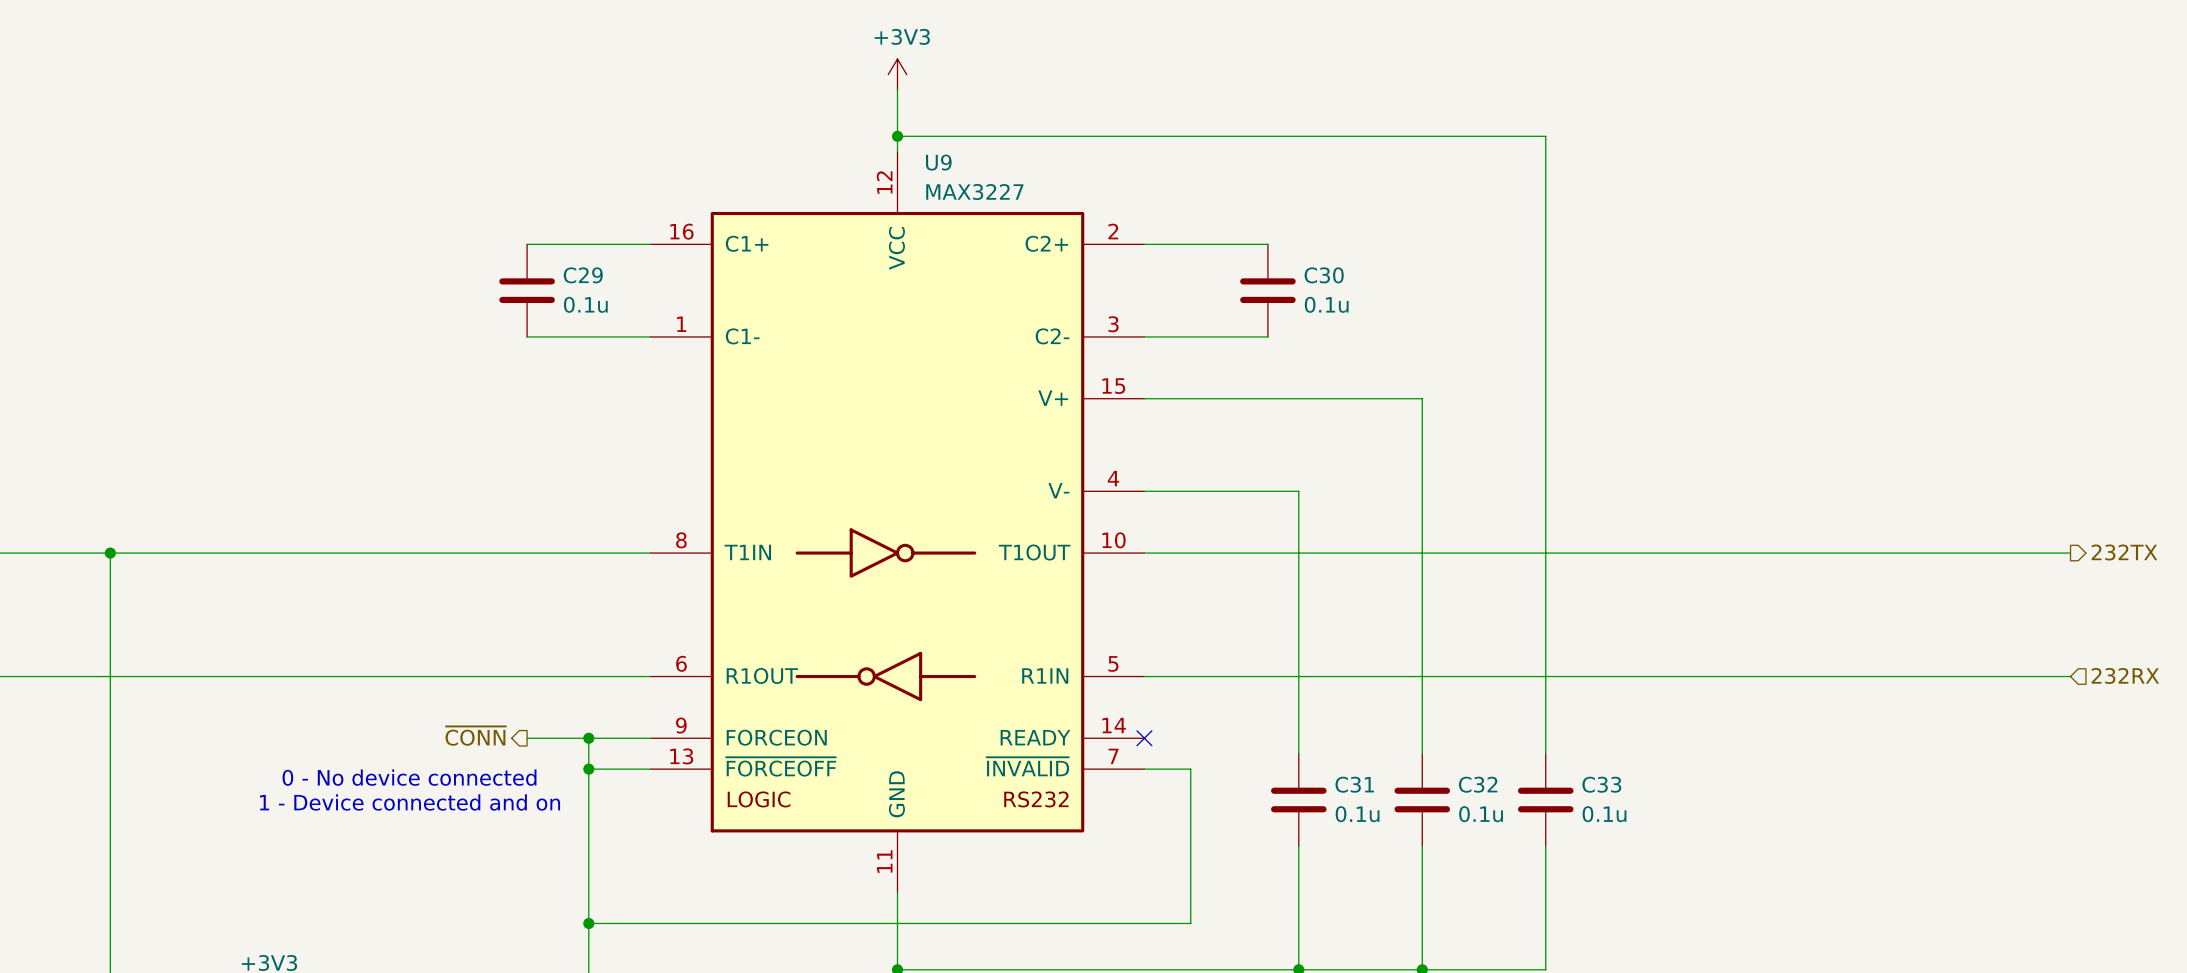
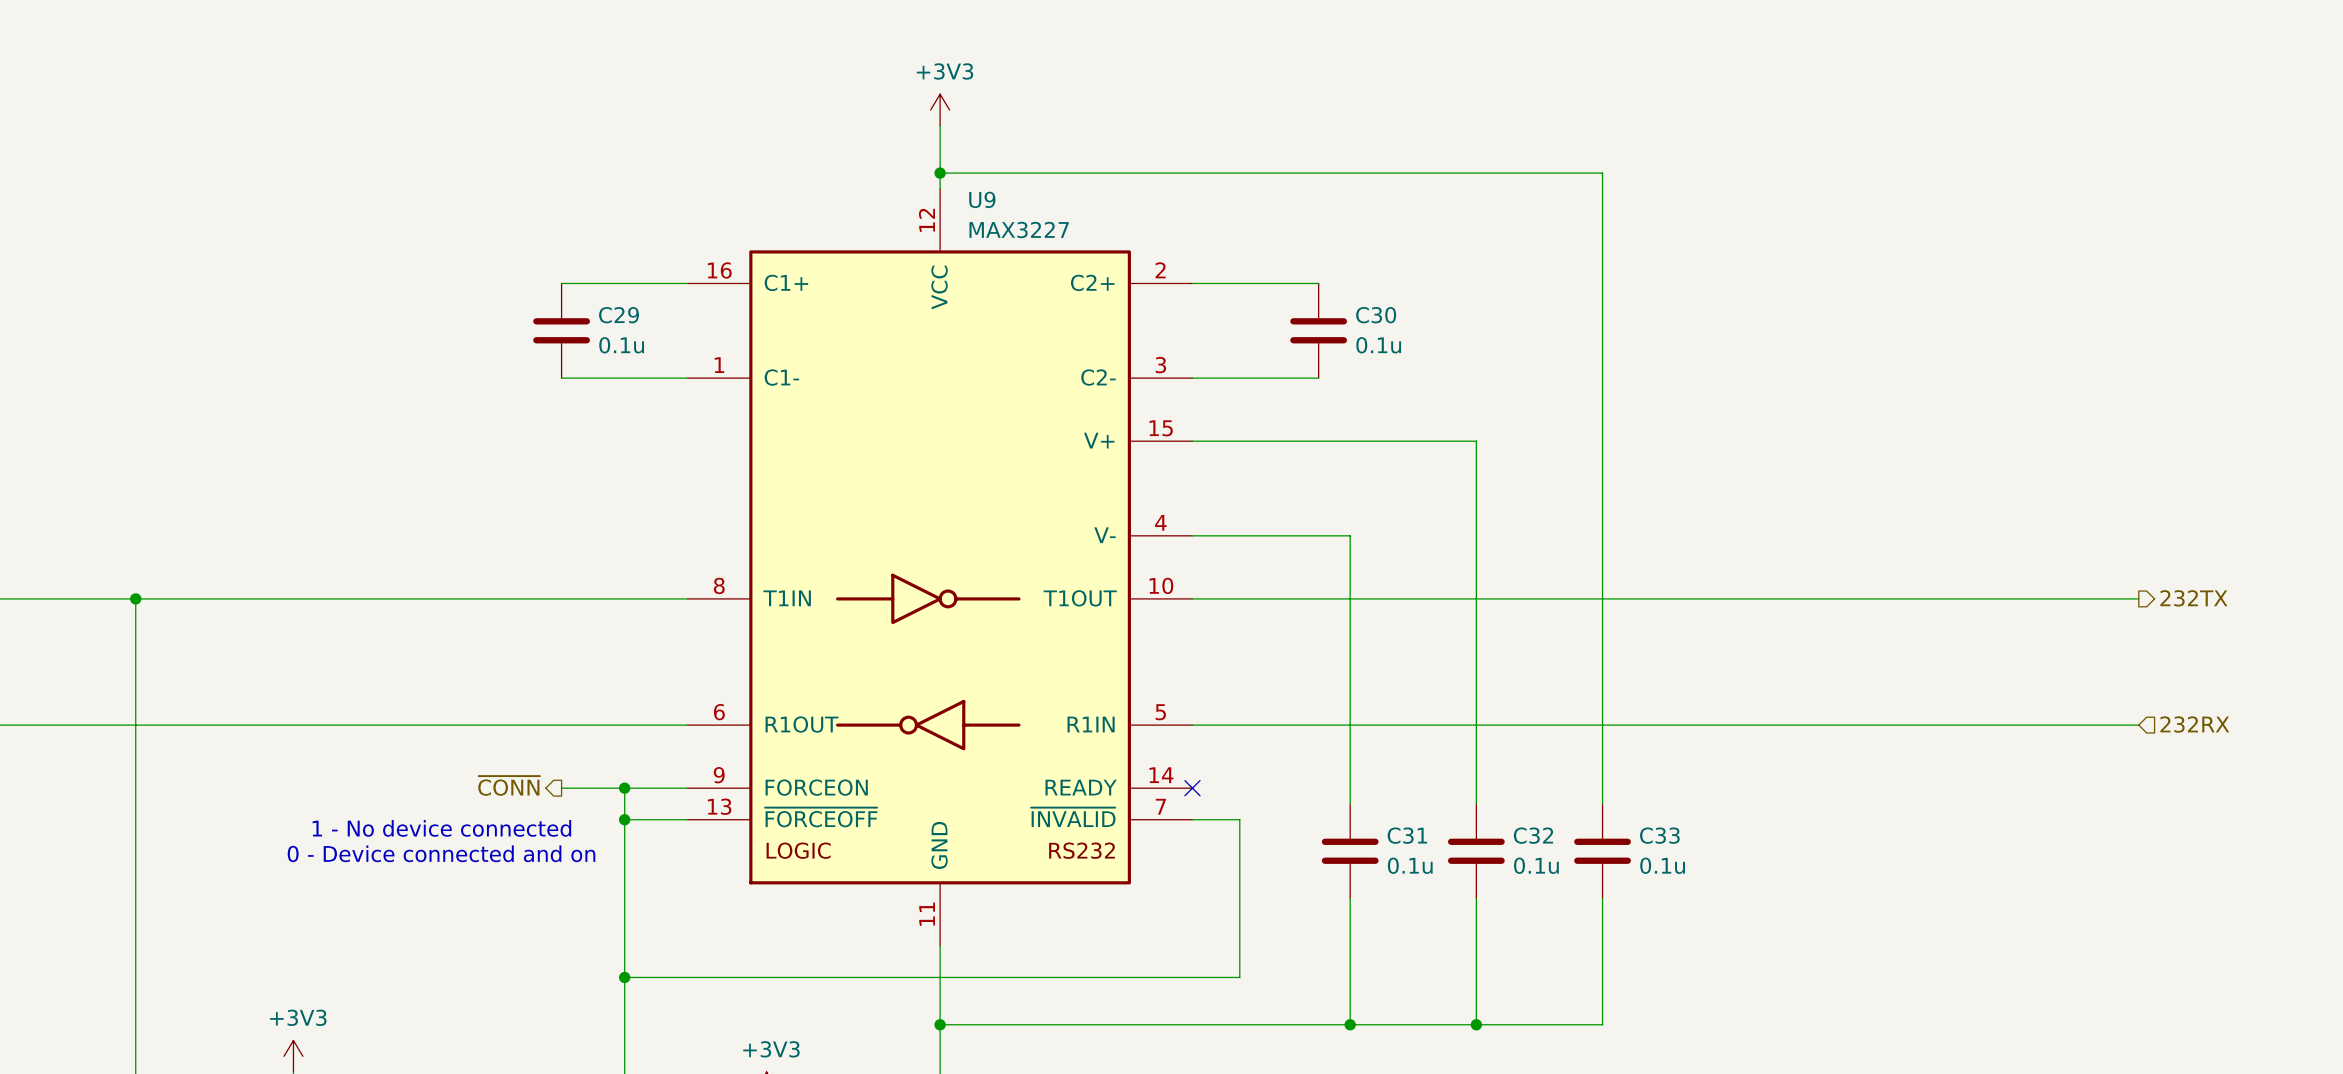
text: 0 - No device connected (409, 777) -> 1 - No device connected (441, 828)
text: 1 - Device connected and on (410, 802) -> 0 - Device connected and on (441, 853)

